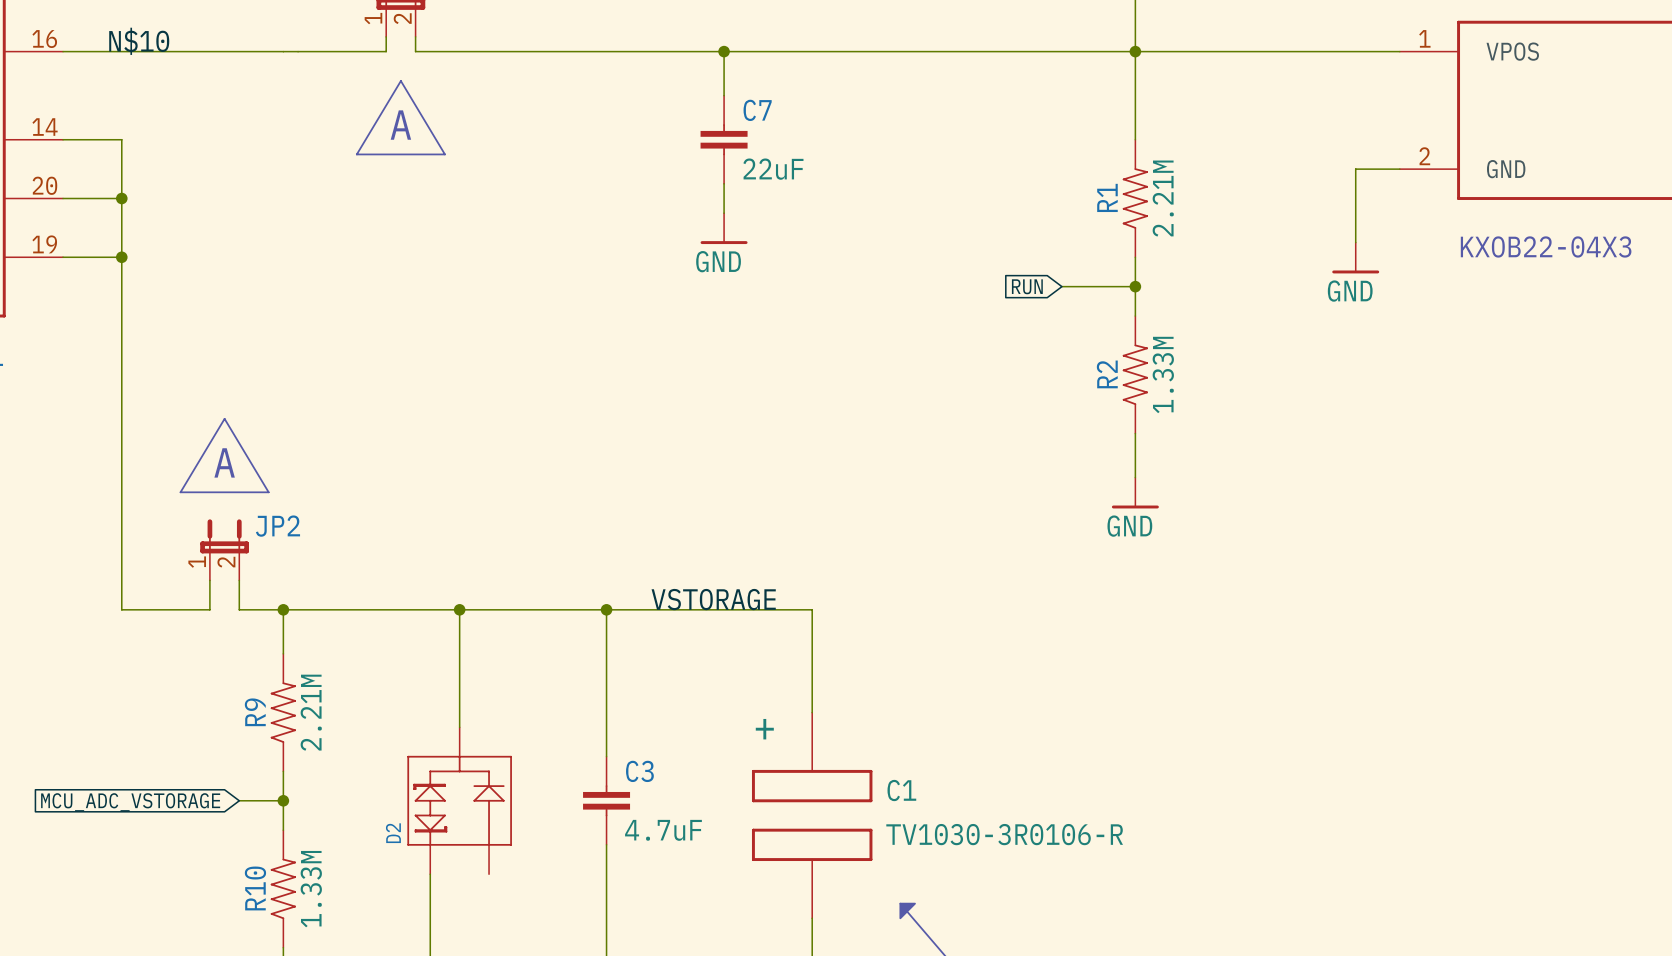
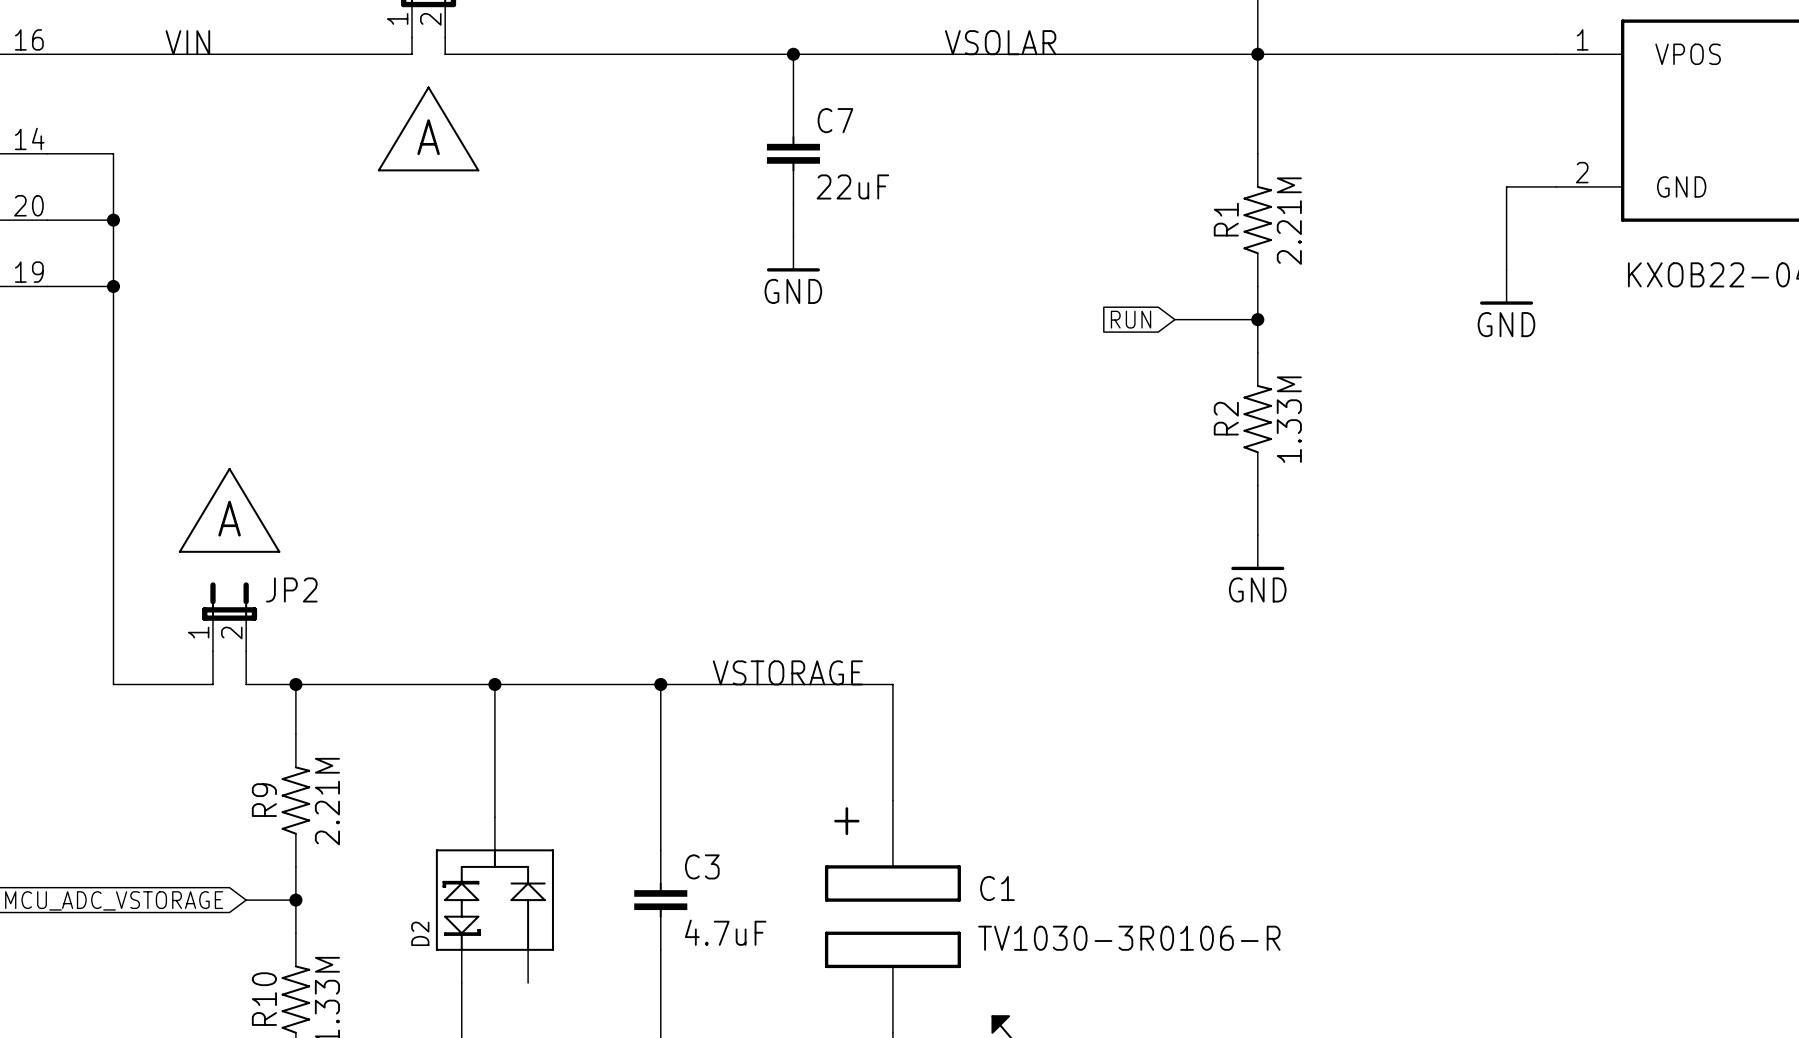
label: N$10 (139, 41) -> none
label: none -> VIN (187, 42)
label: none -> VSOLAR (1000, 42)

